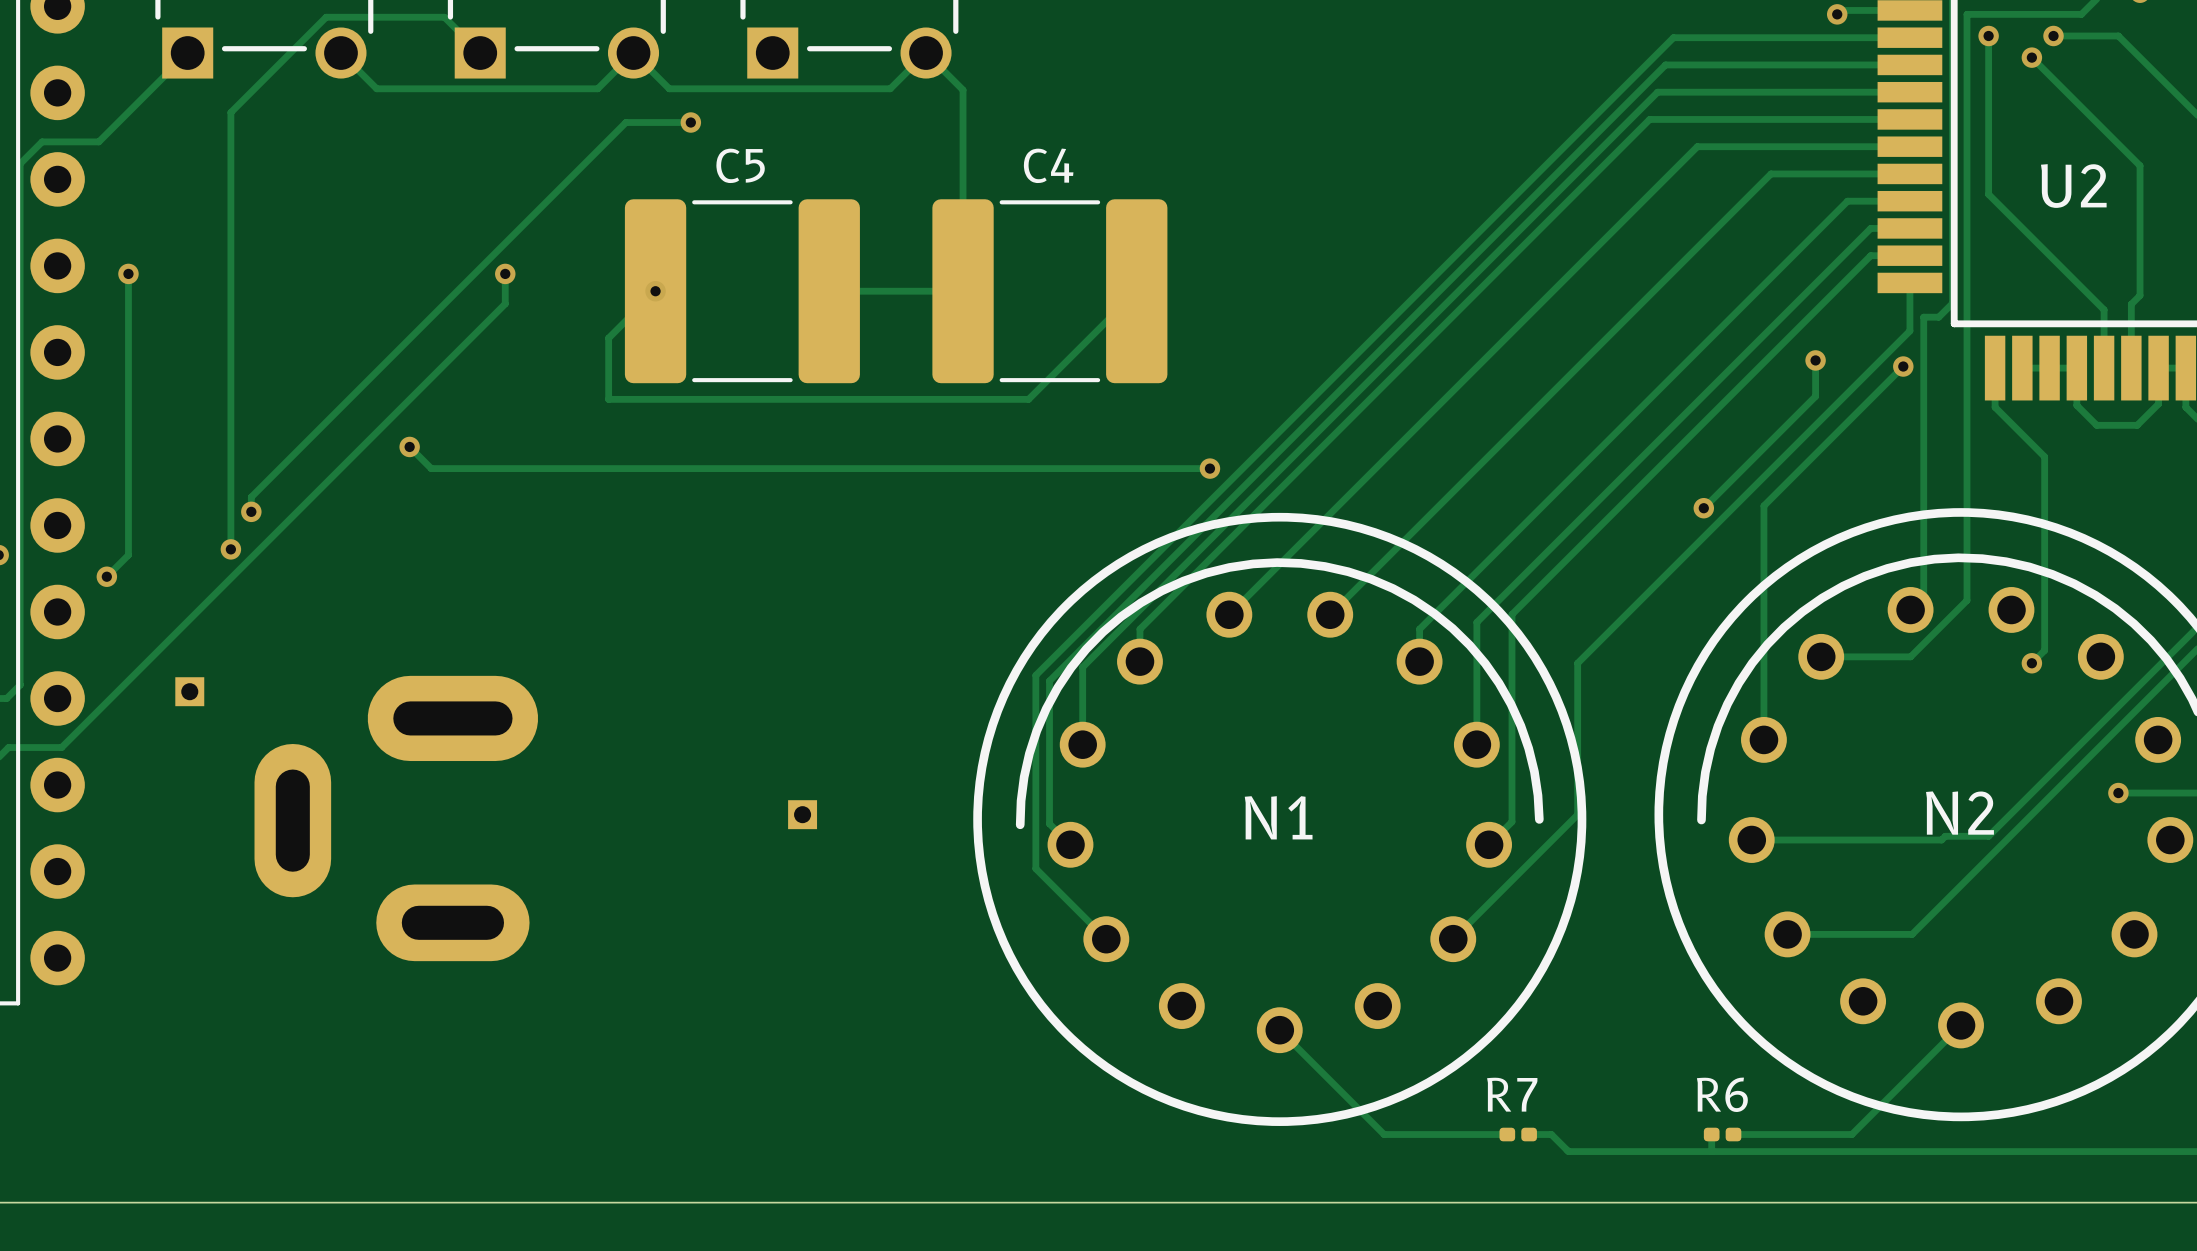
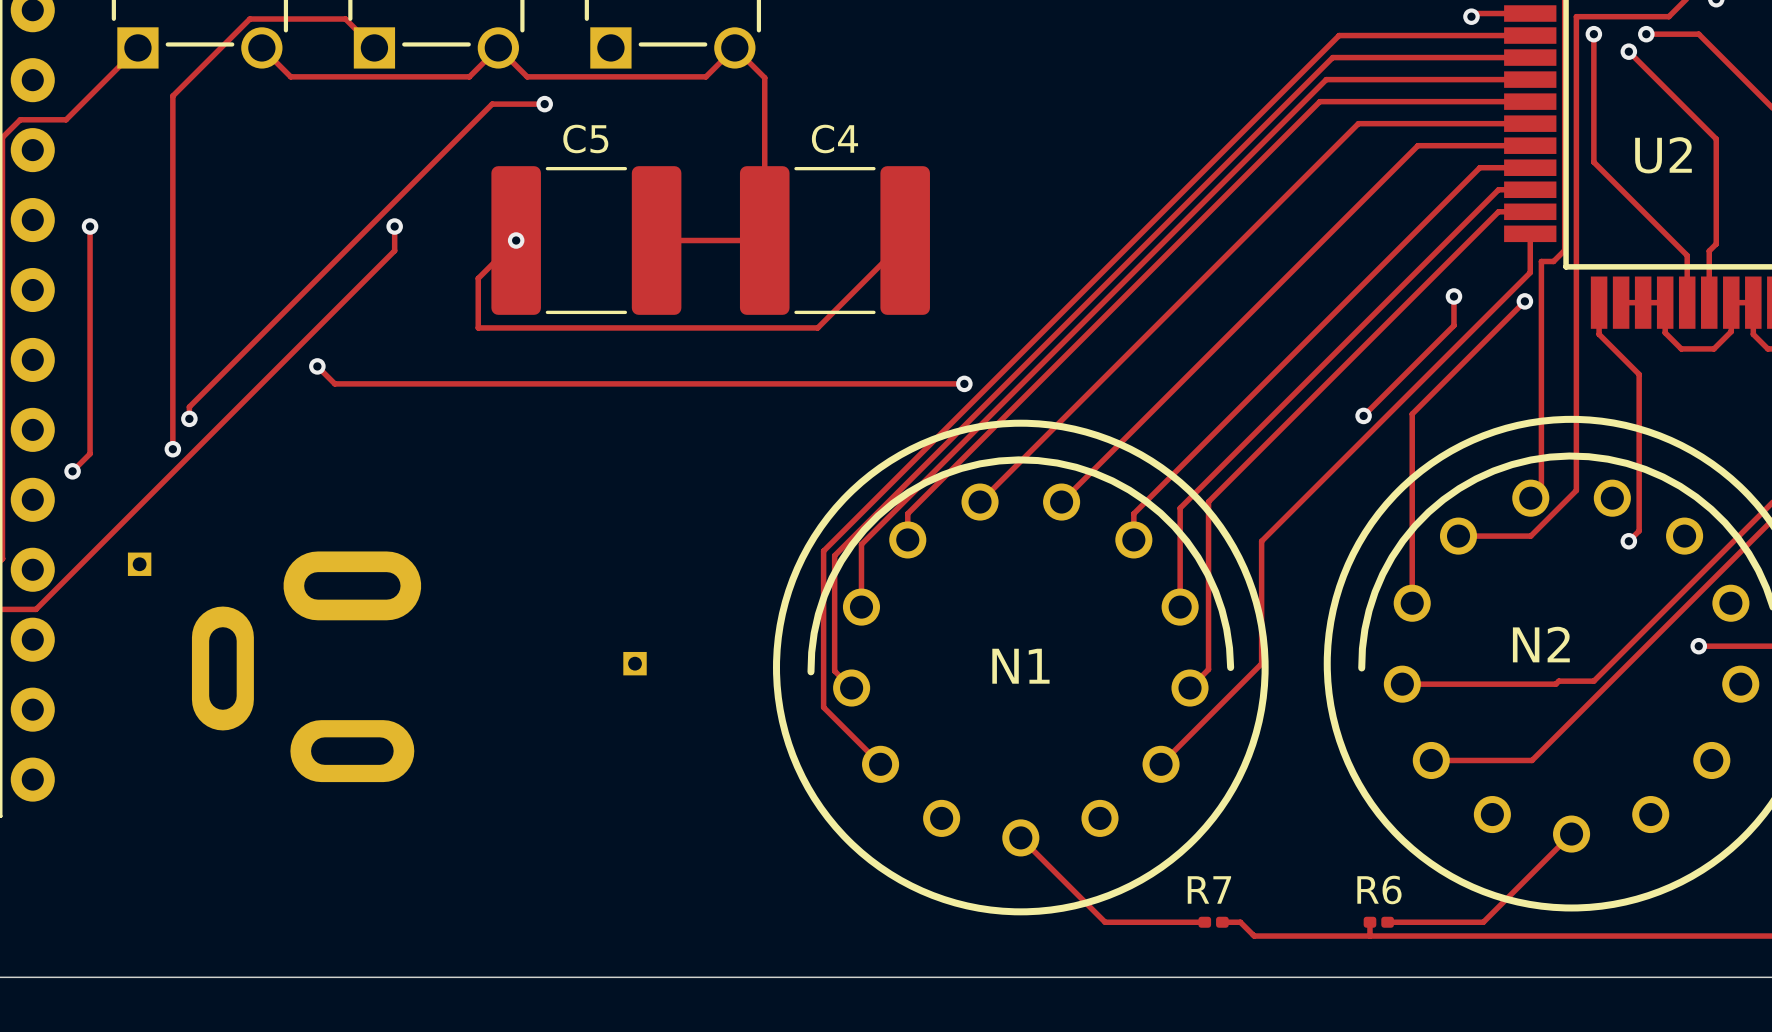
N2 name position: N2 (1959, 813) -> N2 (1541, 644)

